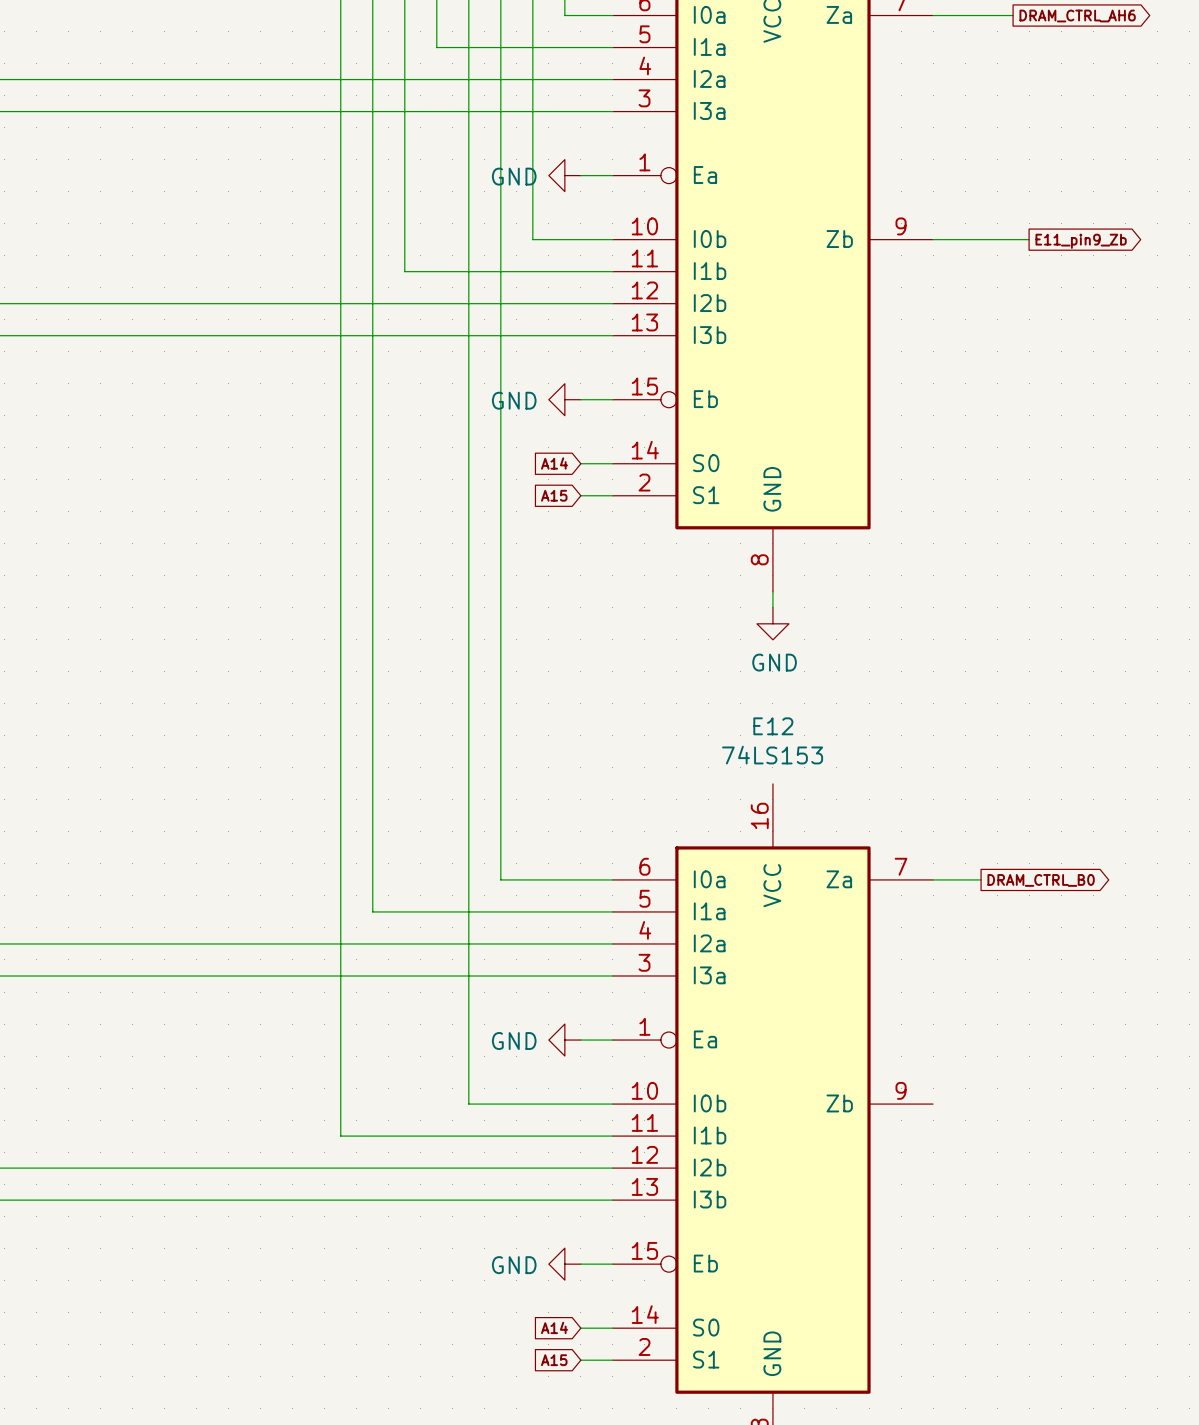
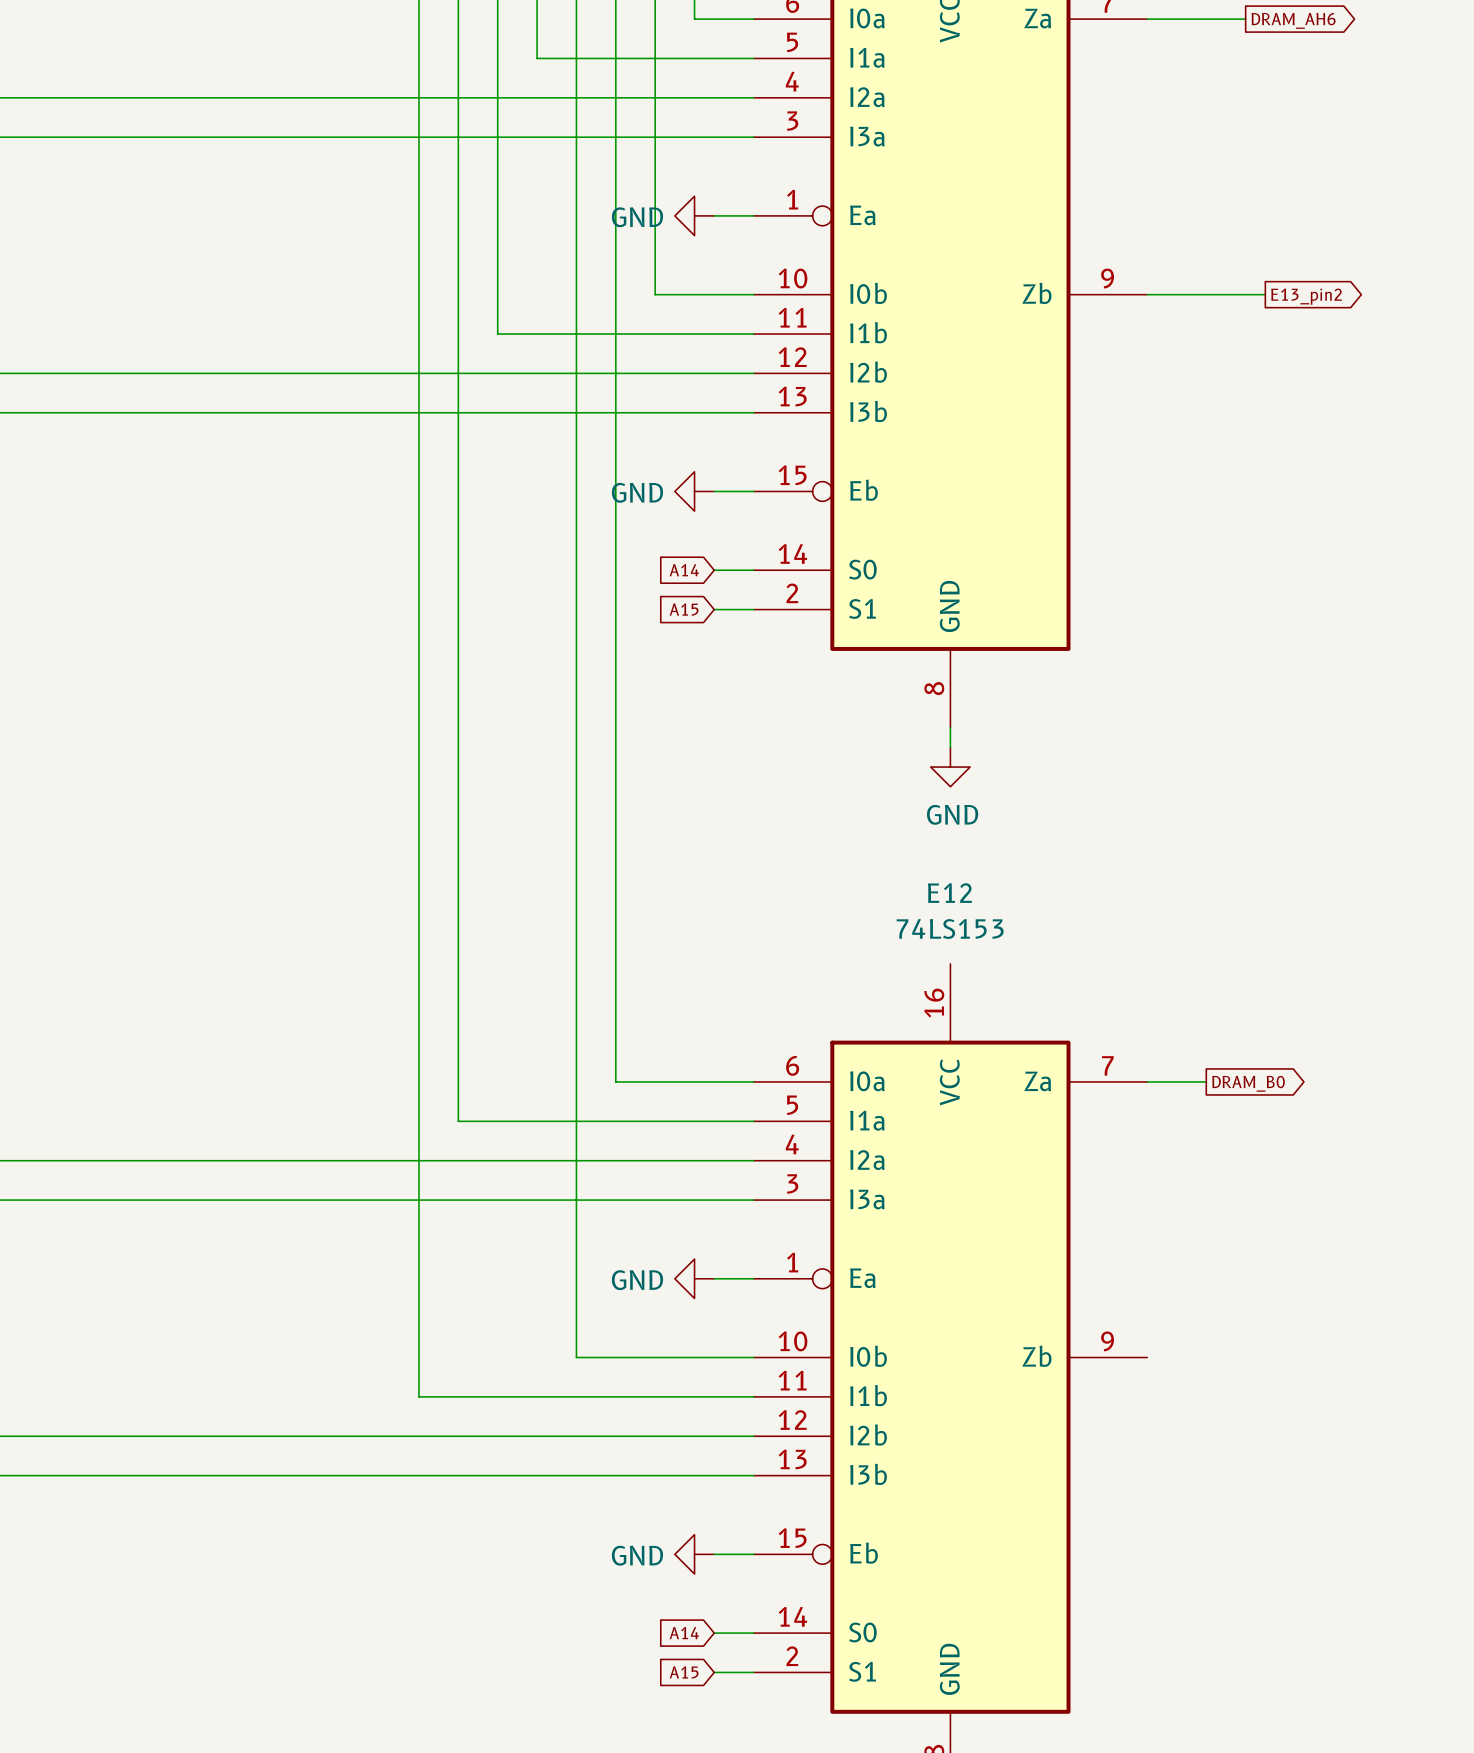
global label: DRAM_CTRL_AH6 (1077, 16) -> DRAM_AH6 (1293, 20)
global label: E11_pin9_Zb (1081, 241) -> E13_pin2 (1306, 296)
global label: DRAM_CTRL_B0 (1041, 880) -> DRAM_B0 (1248, 1083)

